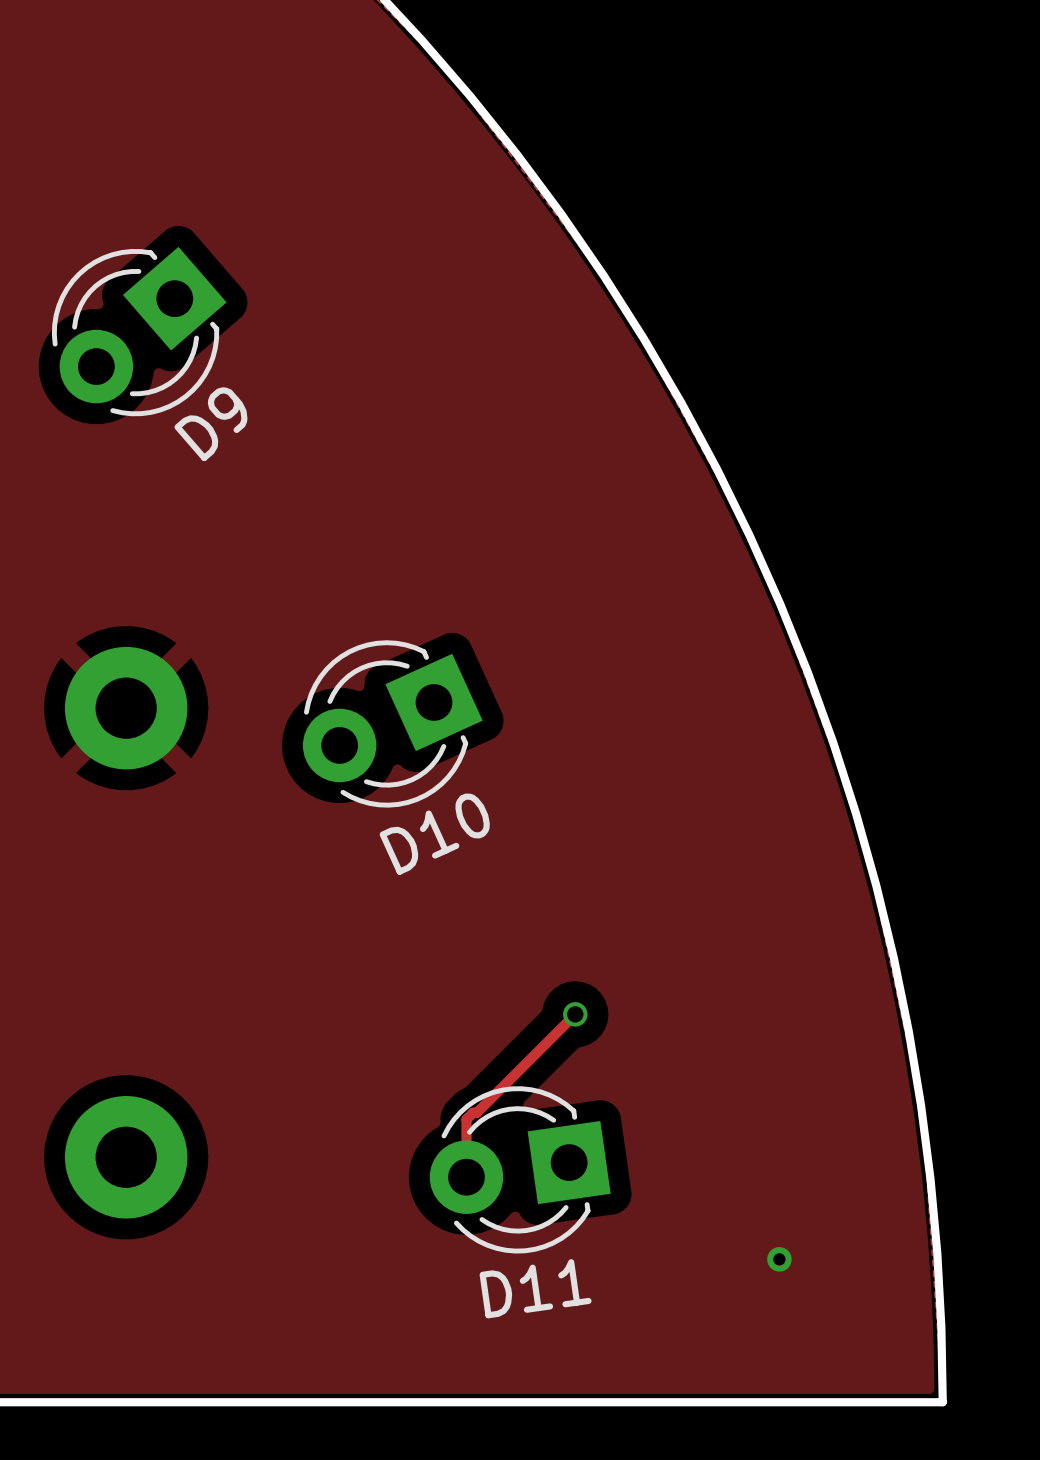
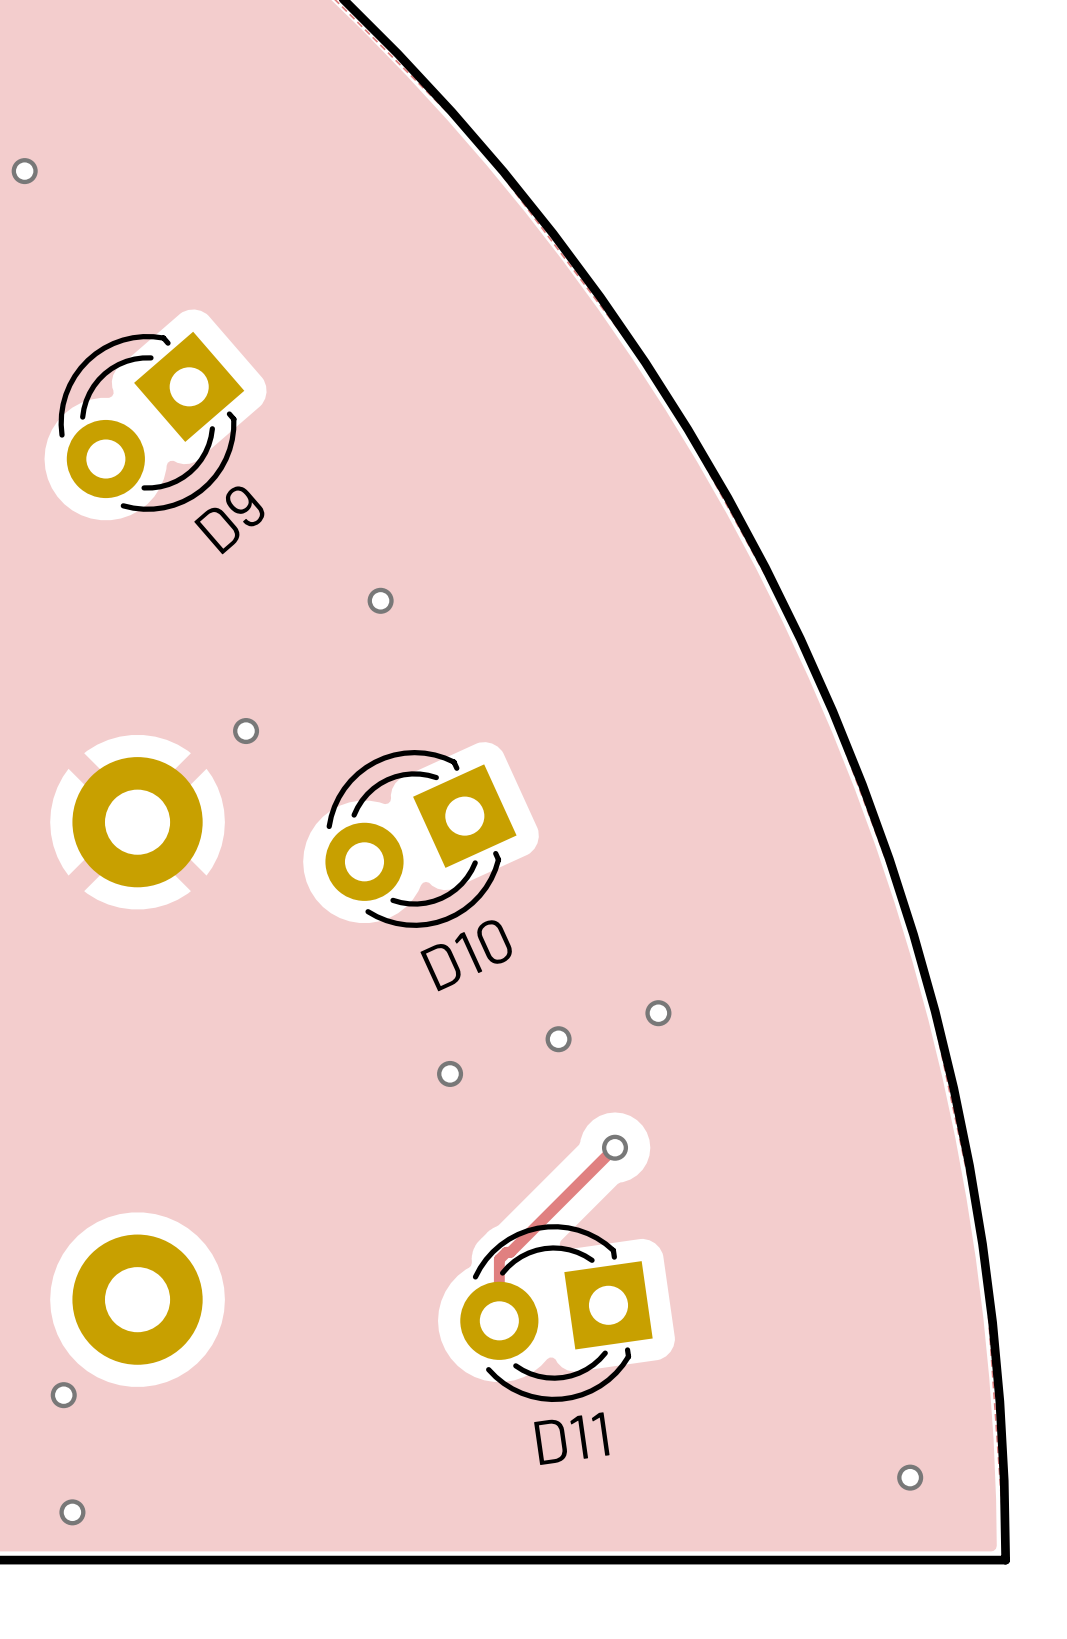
via: none -> (24, 171)
via: none -> (380, 600)
via: none -> (246, 731)
via: none -> (658, 1013)
via: none -> (558, 1039)
via: none -> (450, 1073)
via: none -> (63, 1395)
part: (779, 1259) -> none
via: none -> (910, 1477)
via: none -> (72, 1512)

